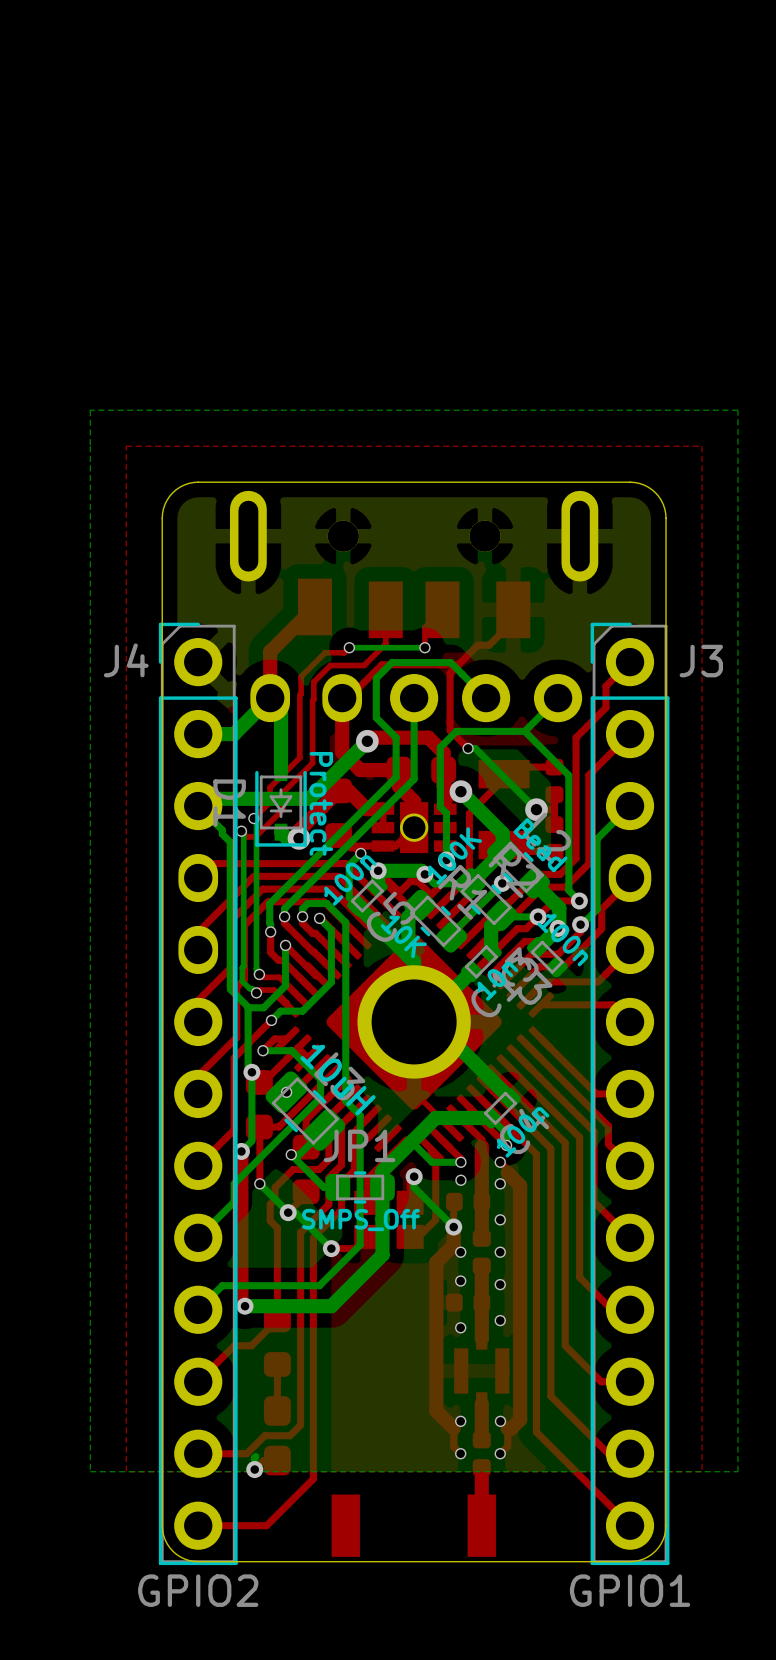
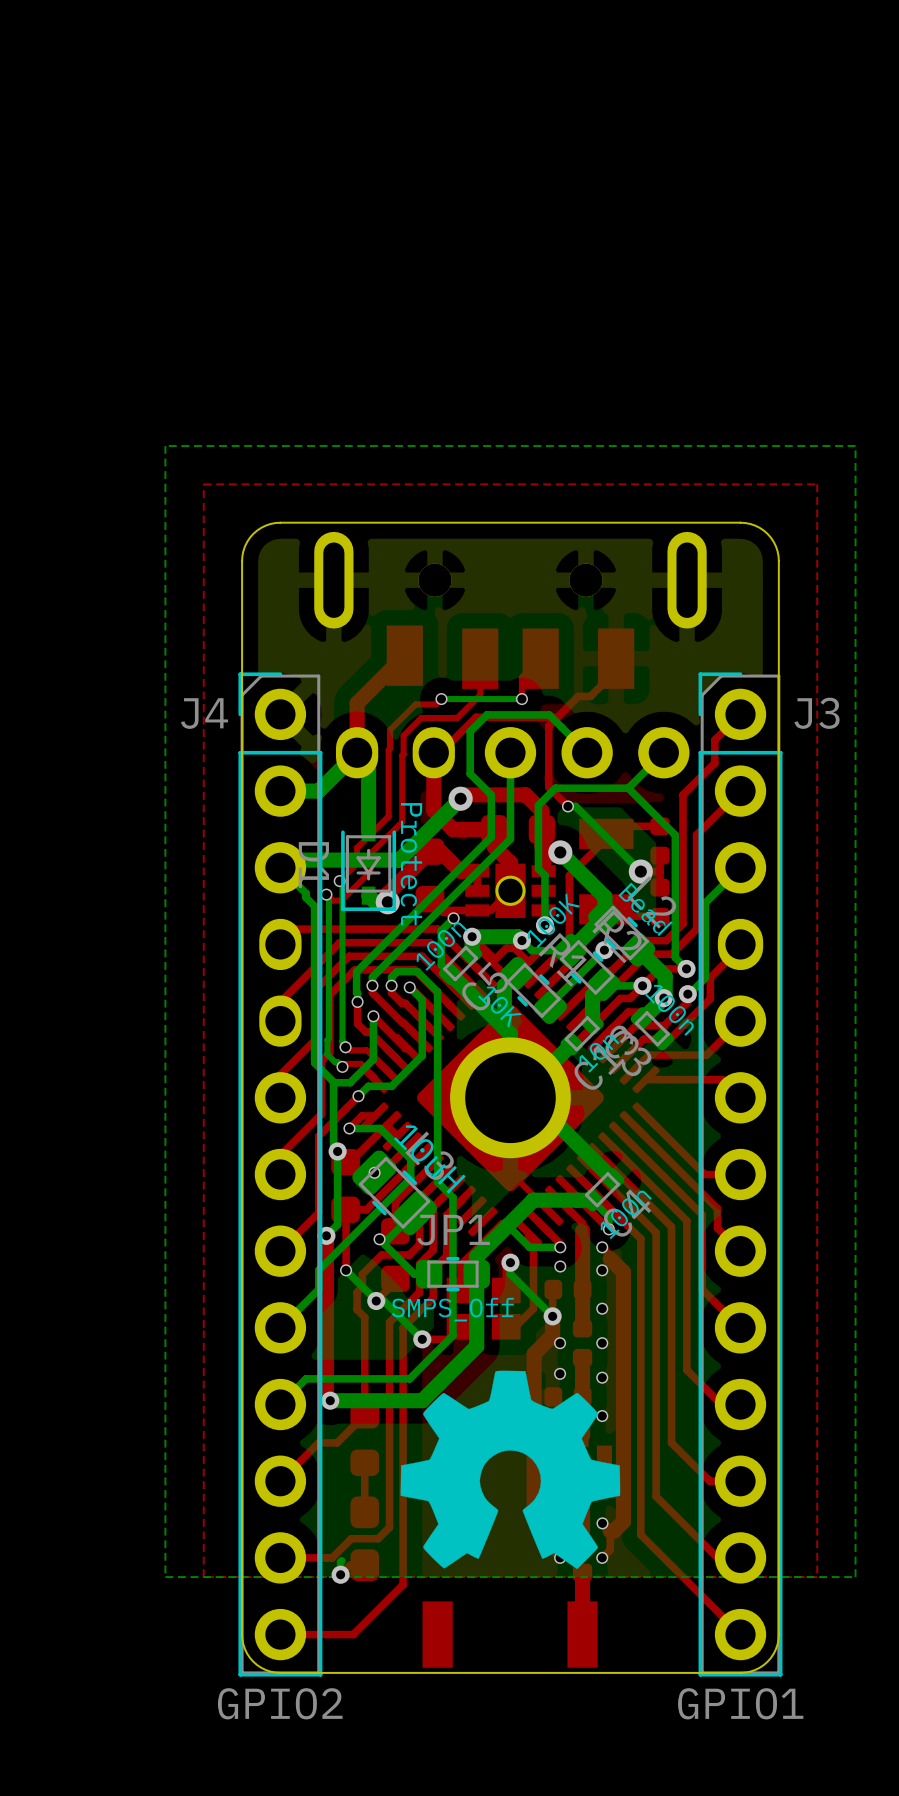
drawing: none -> [400, 1370, 621, 1570]

